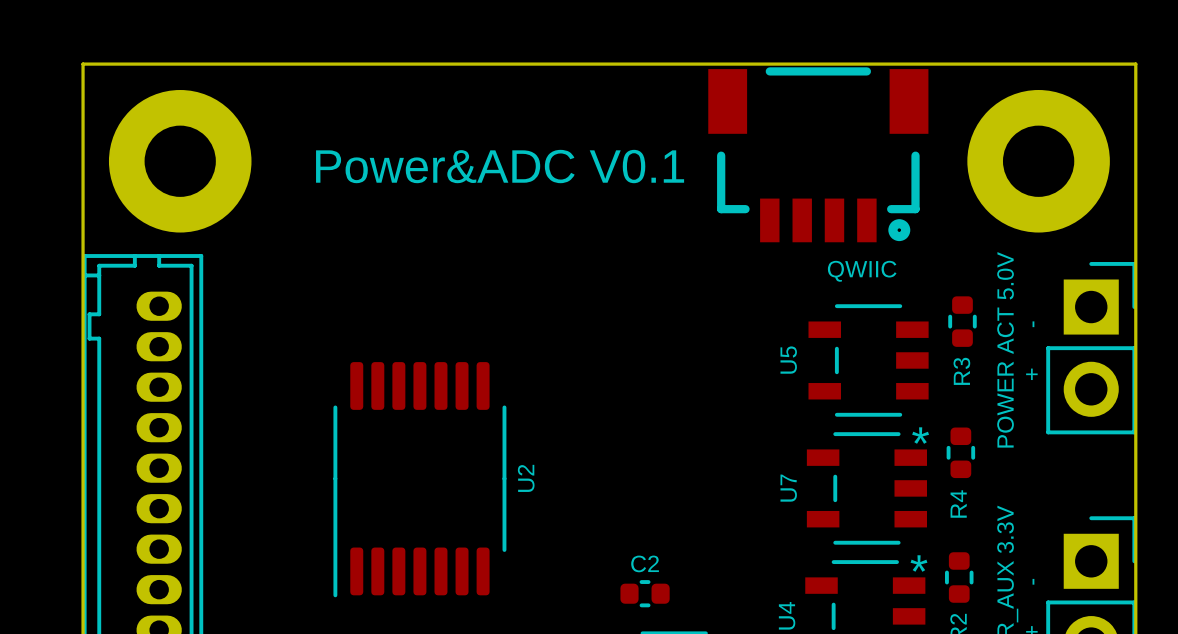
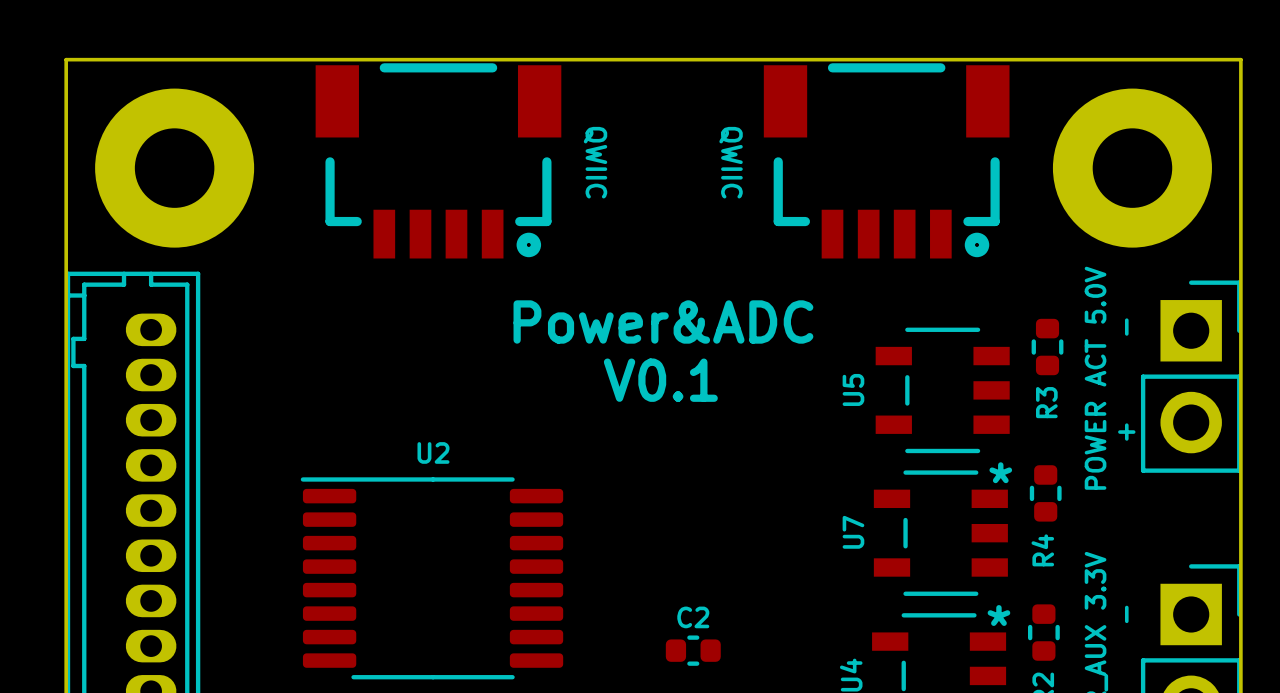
part: none -> (438, 160)
text: none -> QWIIC (595, 162)
text: none -> QWIIC (731, 162)
text: Power&ADC V0.1 (500, 166) -> none
text: QWIIC (862, 271) -> none
text: none -> Power&ADC (663, 321)
text: none -> V0.1 (660, 380)
U2 footprint: [333, 362, 507, 598] -> [300, 477, 564, 680]
U2 name position: U2 (526, 478) -> U2 (433, 452)

